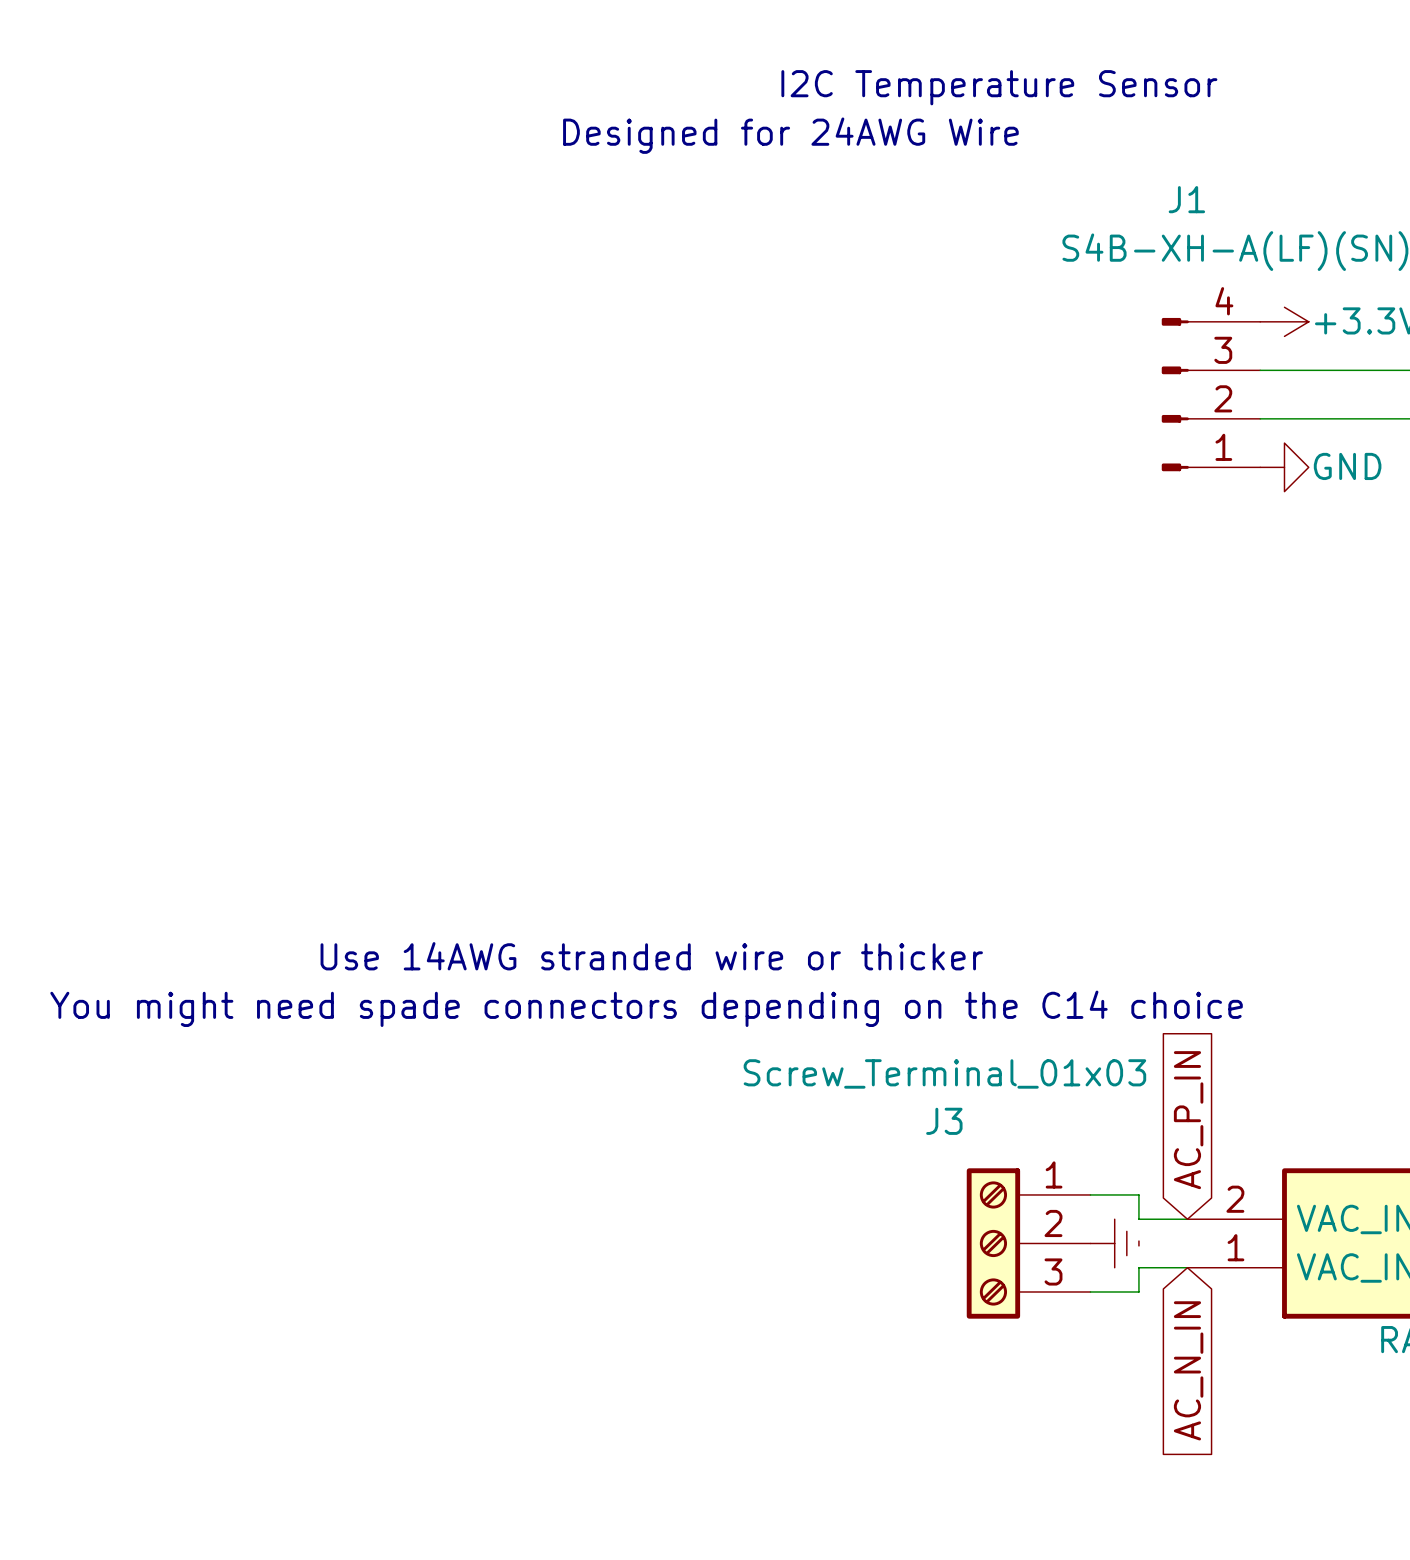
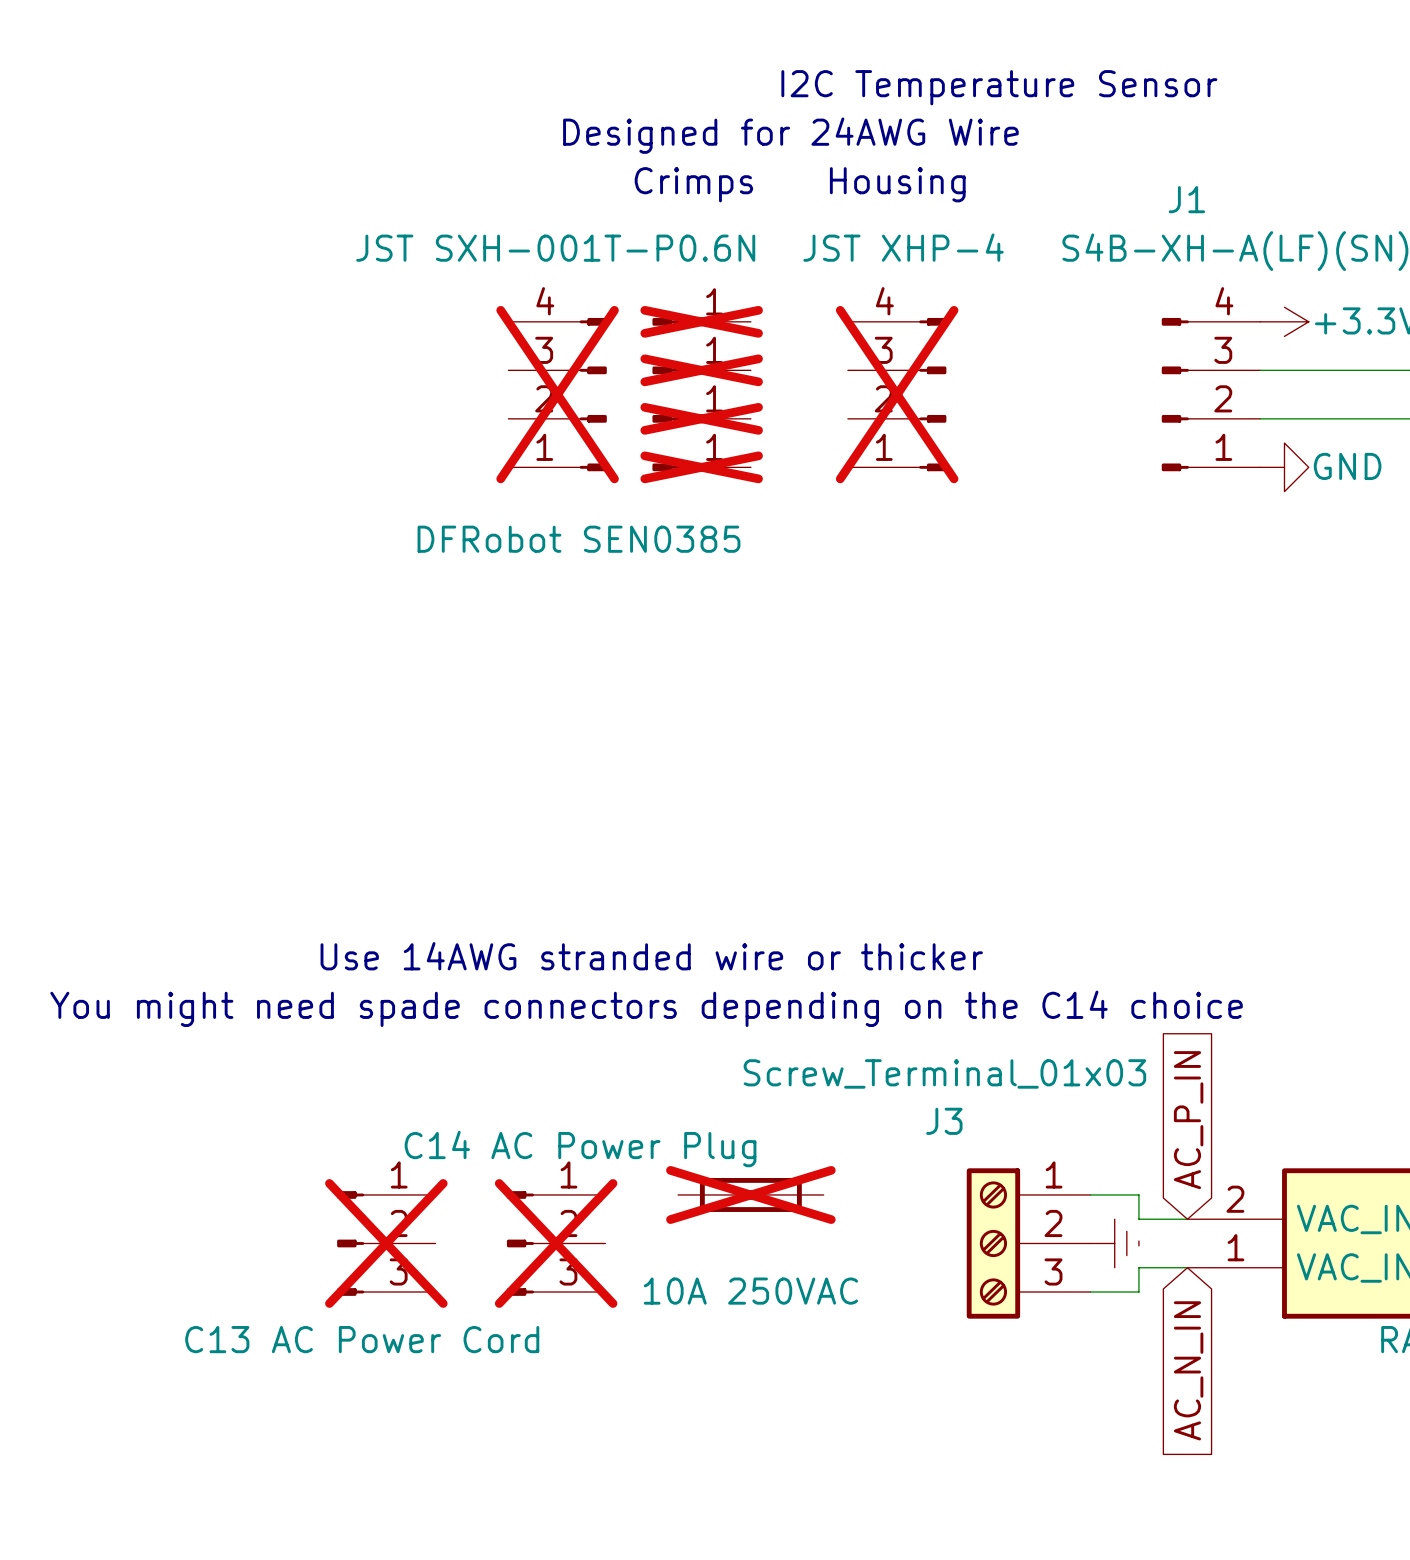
text: none -> Crimps (693, 184)
text: none -> Housing (897, 184)
part: none -> JST SXH-001T-P0.6N (701, 321)
part: none -> (701, 370)
part: none -> DFRobot SEN0385 (557, 394)
part: none -> JST XHP-4 (897, 394)
part: none -> (701, 418)
part: none -> (701, 467)
part: none -> 10A 250VAC (750, 1194)
part: none -> C13 AC Power Cord (386, 1243)
part: none -> C14 AC Power Plug (556, 1243)

